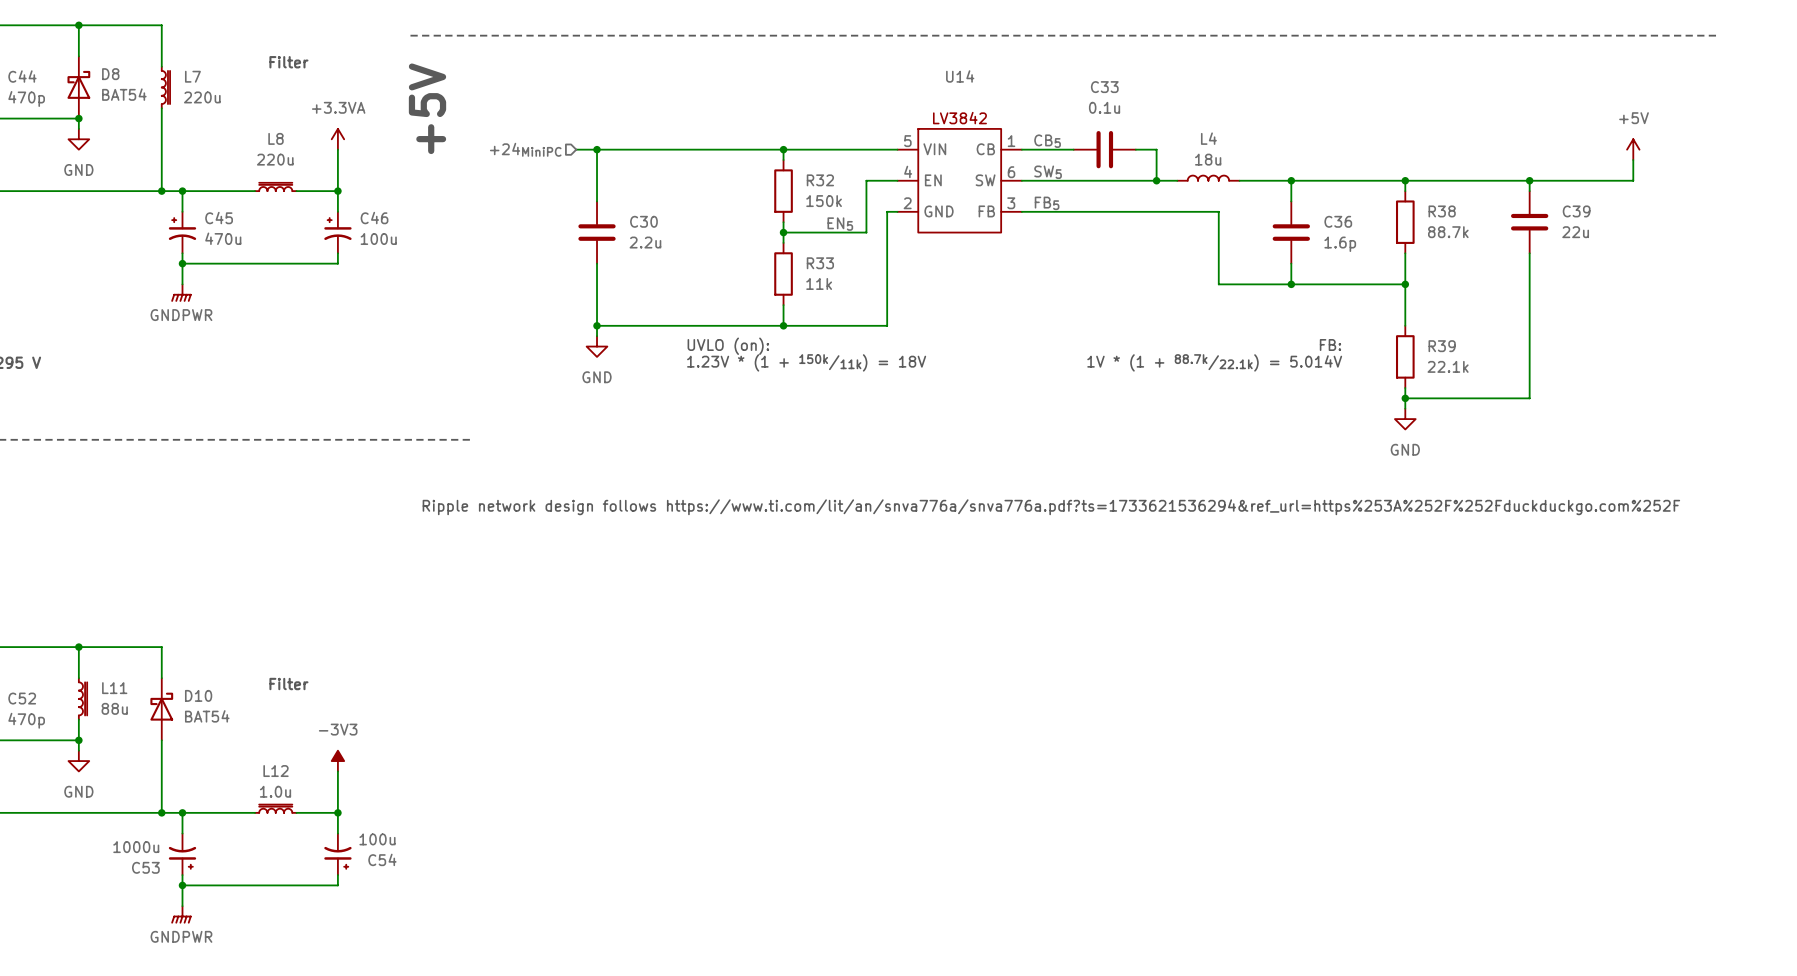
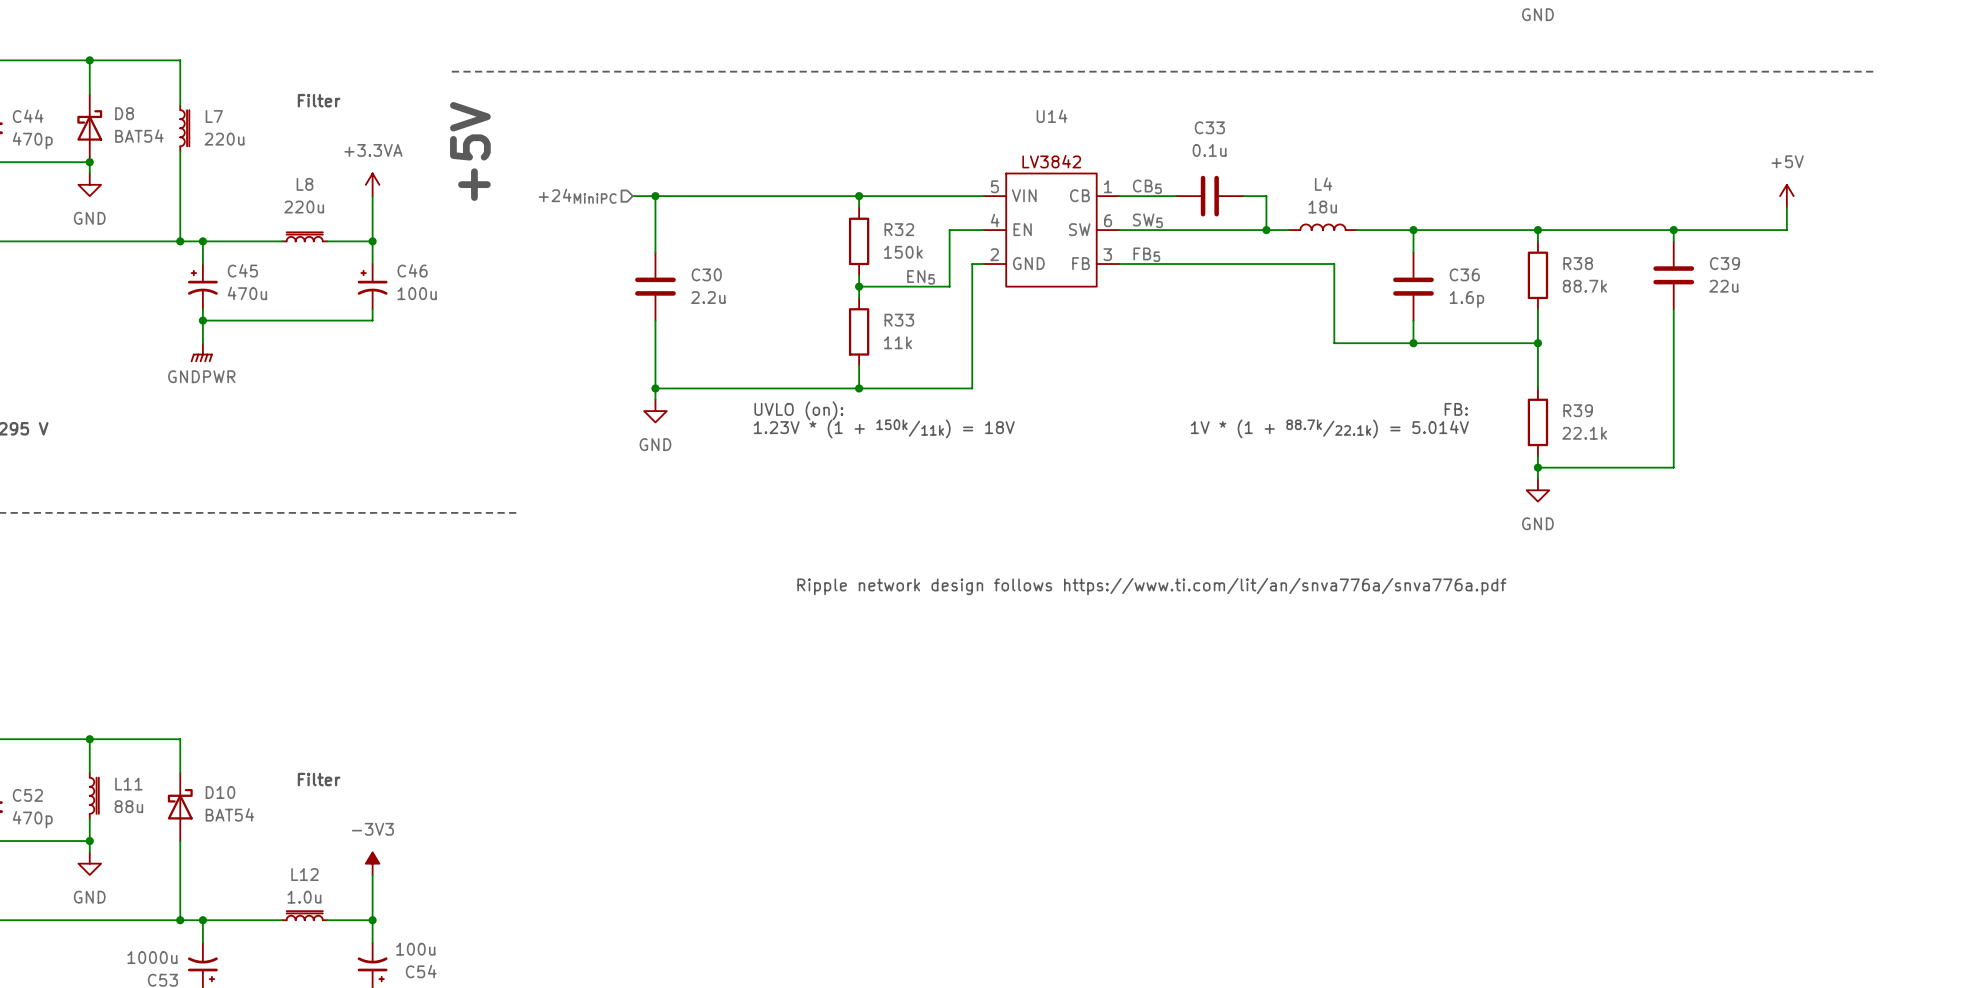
text: Ripple network design follows https://www.ti.com/lit/an/snva776a/snva776a.pdf?ts=1733621536294&ref_url=https%253A%252F%252Fduckduckgo.com%252F (1051, 507) -> Ripple network design follows https://www.ti.com/lit/an/snva776a/snva776a.pdf (1151, 586)

